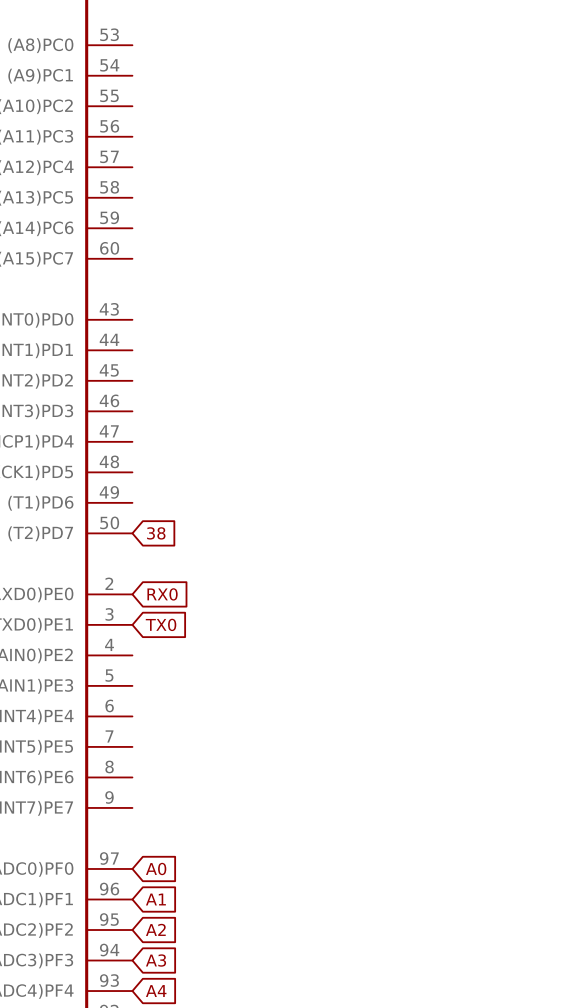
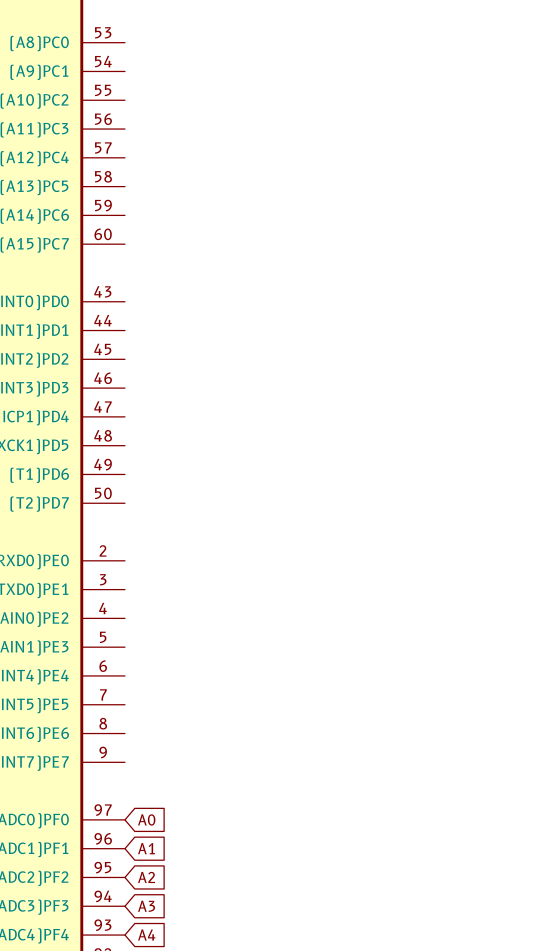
global label: 38 (156, 533) -> none
global label: RX0 (162, 594) -> none
global label: TX0 (161, 624) -> none

